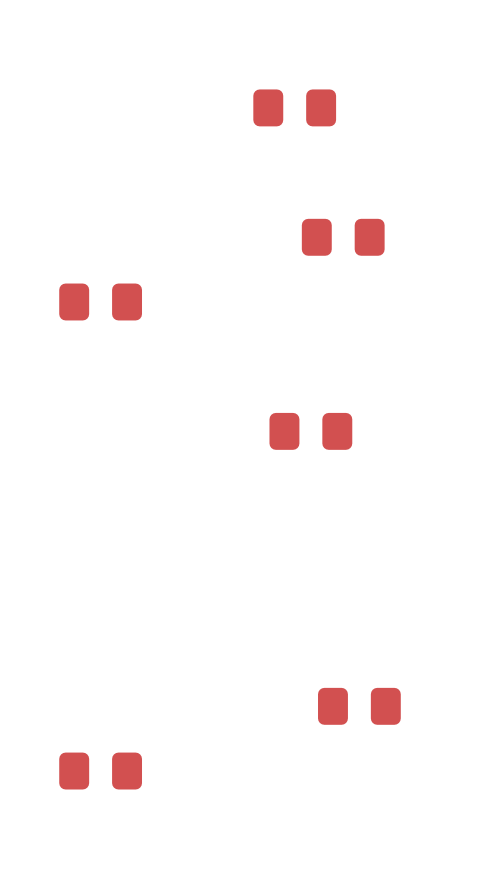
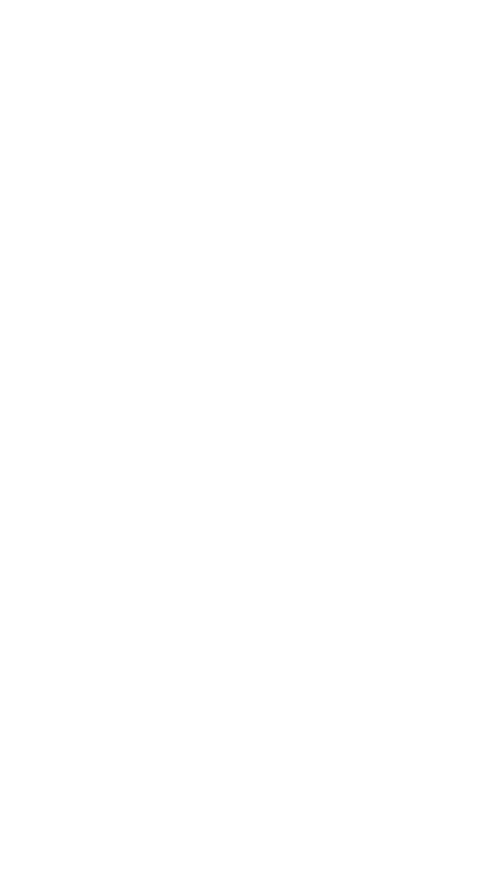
part: (294, 107) -> none
part: (343, 237) -> none
part: (100, 301) -> none
part: (310, 431) -> none
part: (359, 706) -> none
part: (100, 771) -> none

